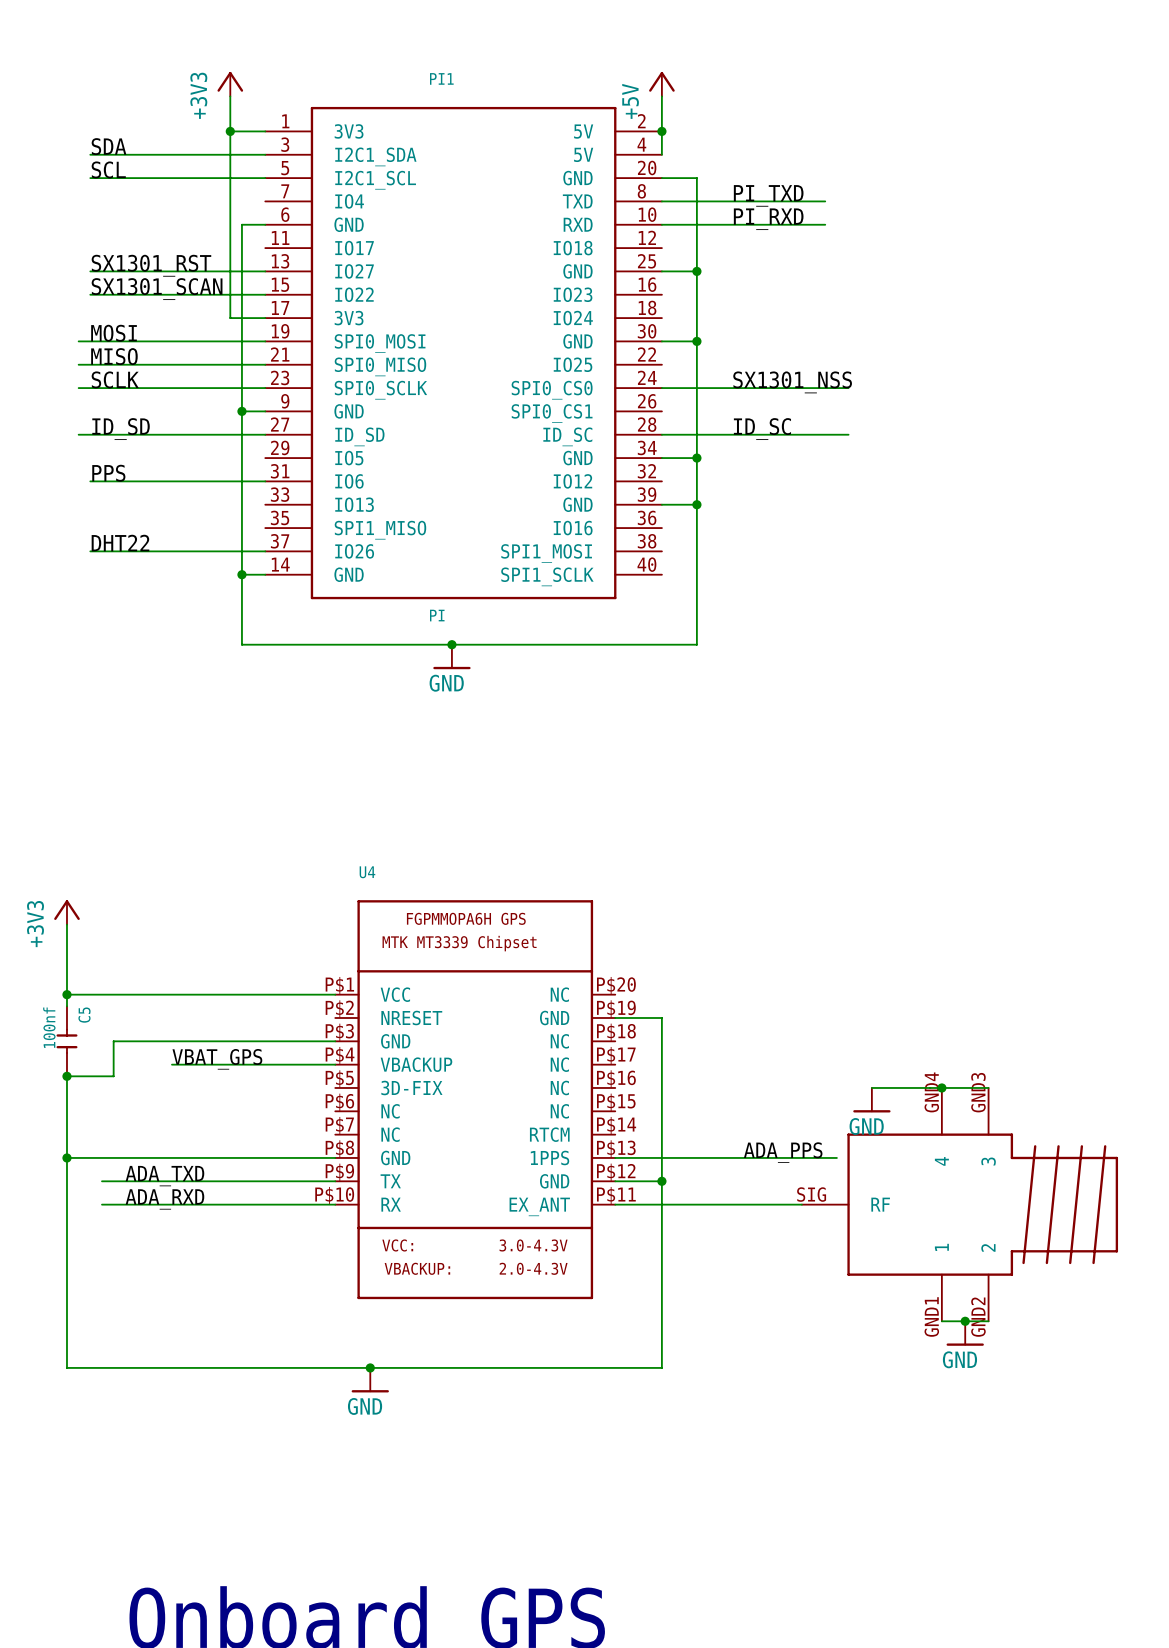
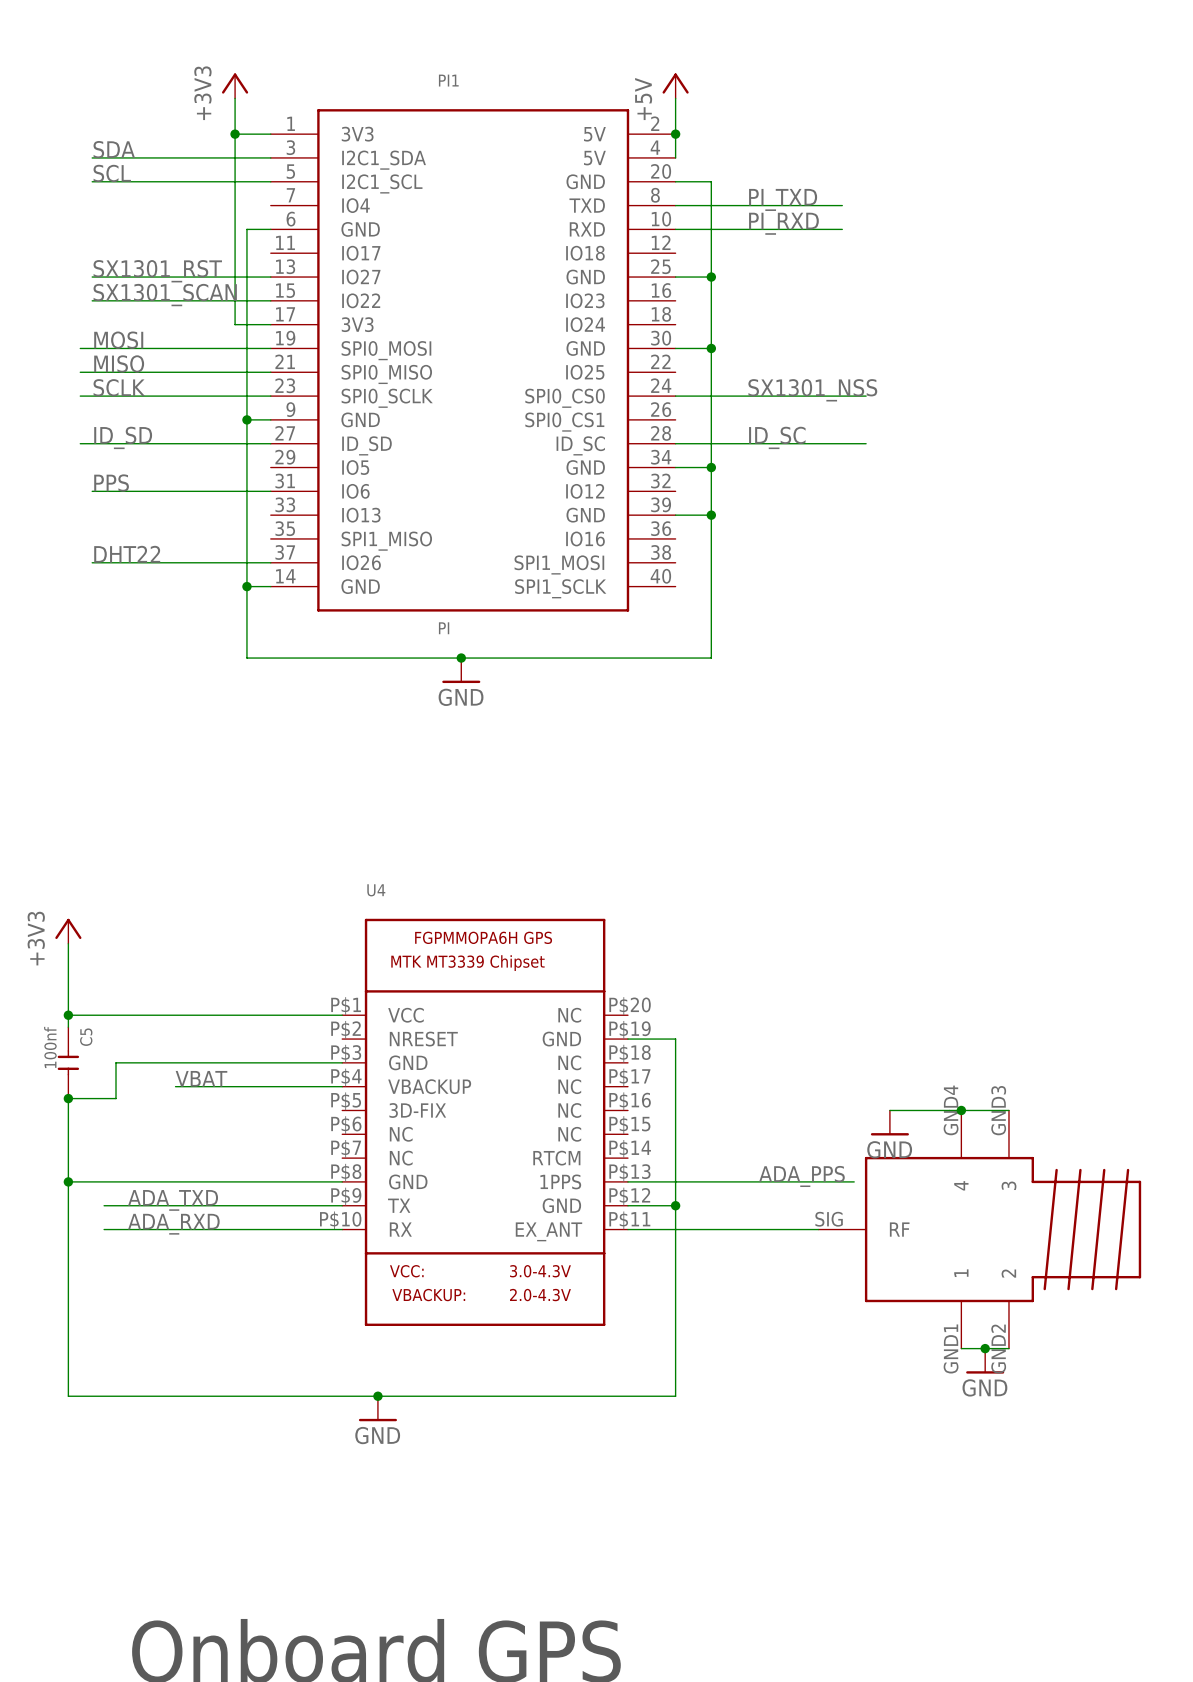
label: VBAT_GPS (217, 1059) -> VBAT (201, 1078)

